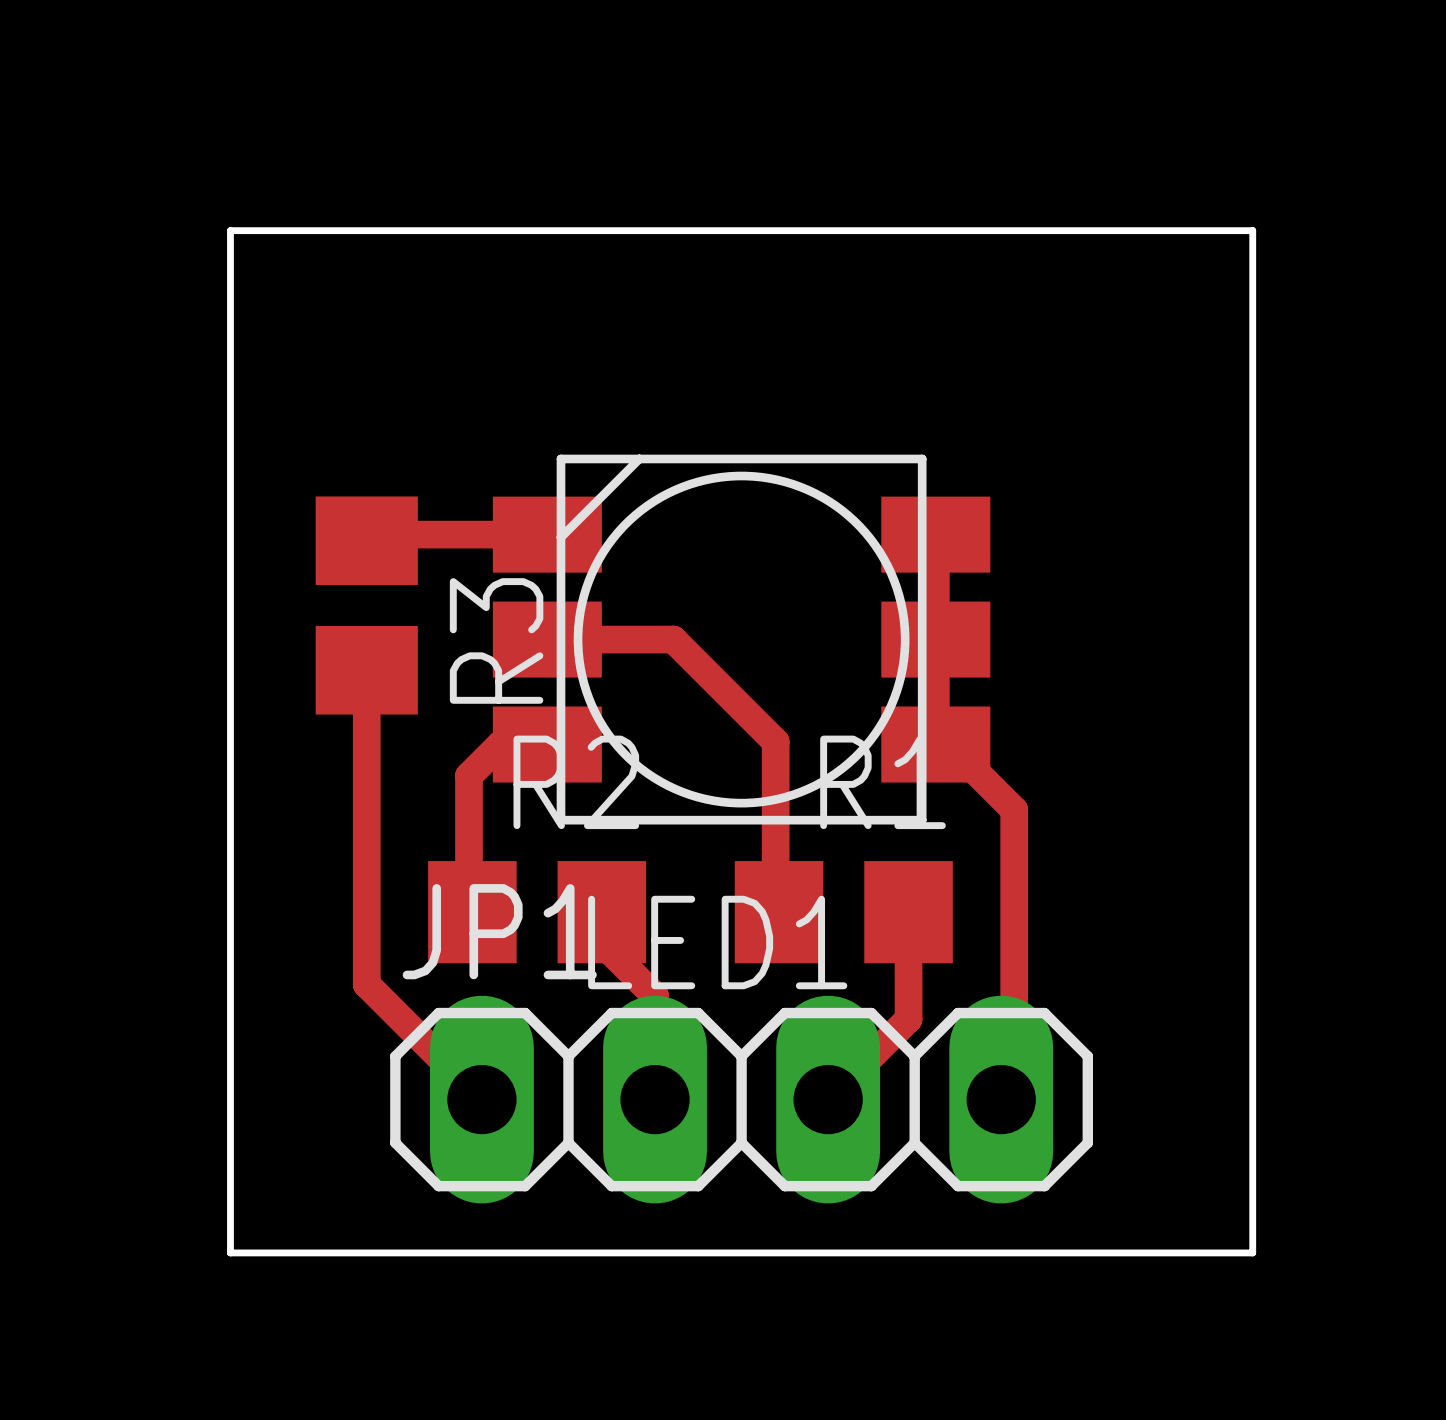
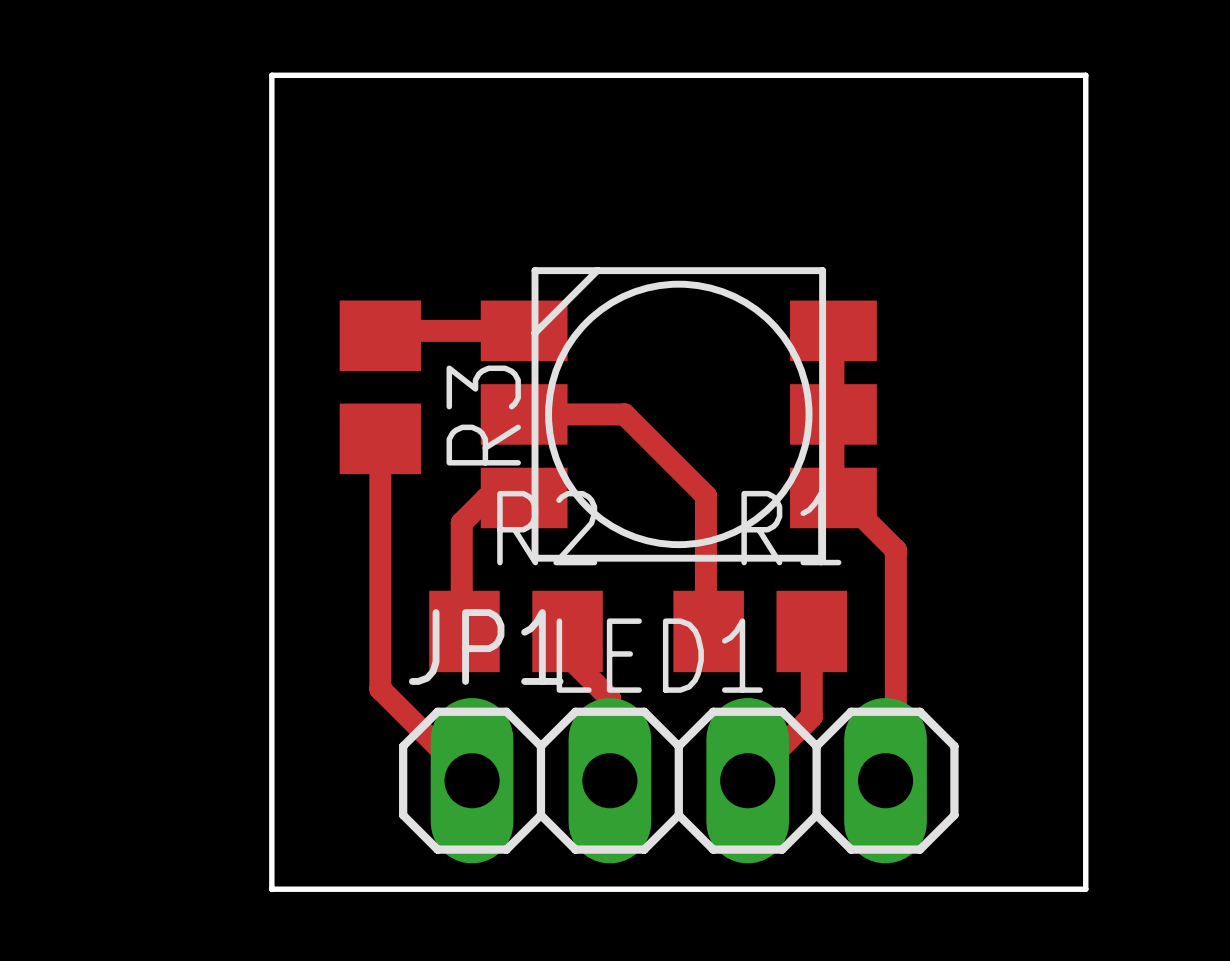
board edge: (230, 230) (1252, 230) -> (271, 88) (271, 75) (1085, 75) (1085, 88)
board edge: (230, 1235) (230, 1252) (1252, 1252) (1252, 1235) -> (271, 889) (1085, 889)

